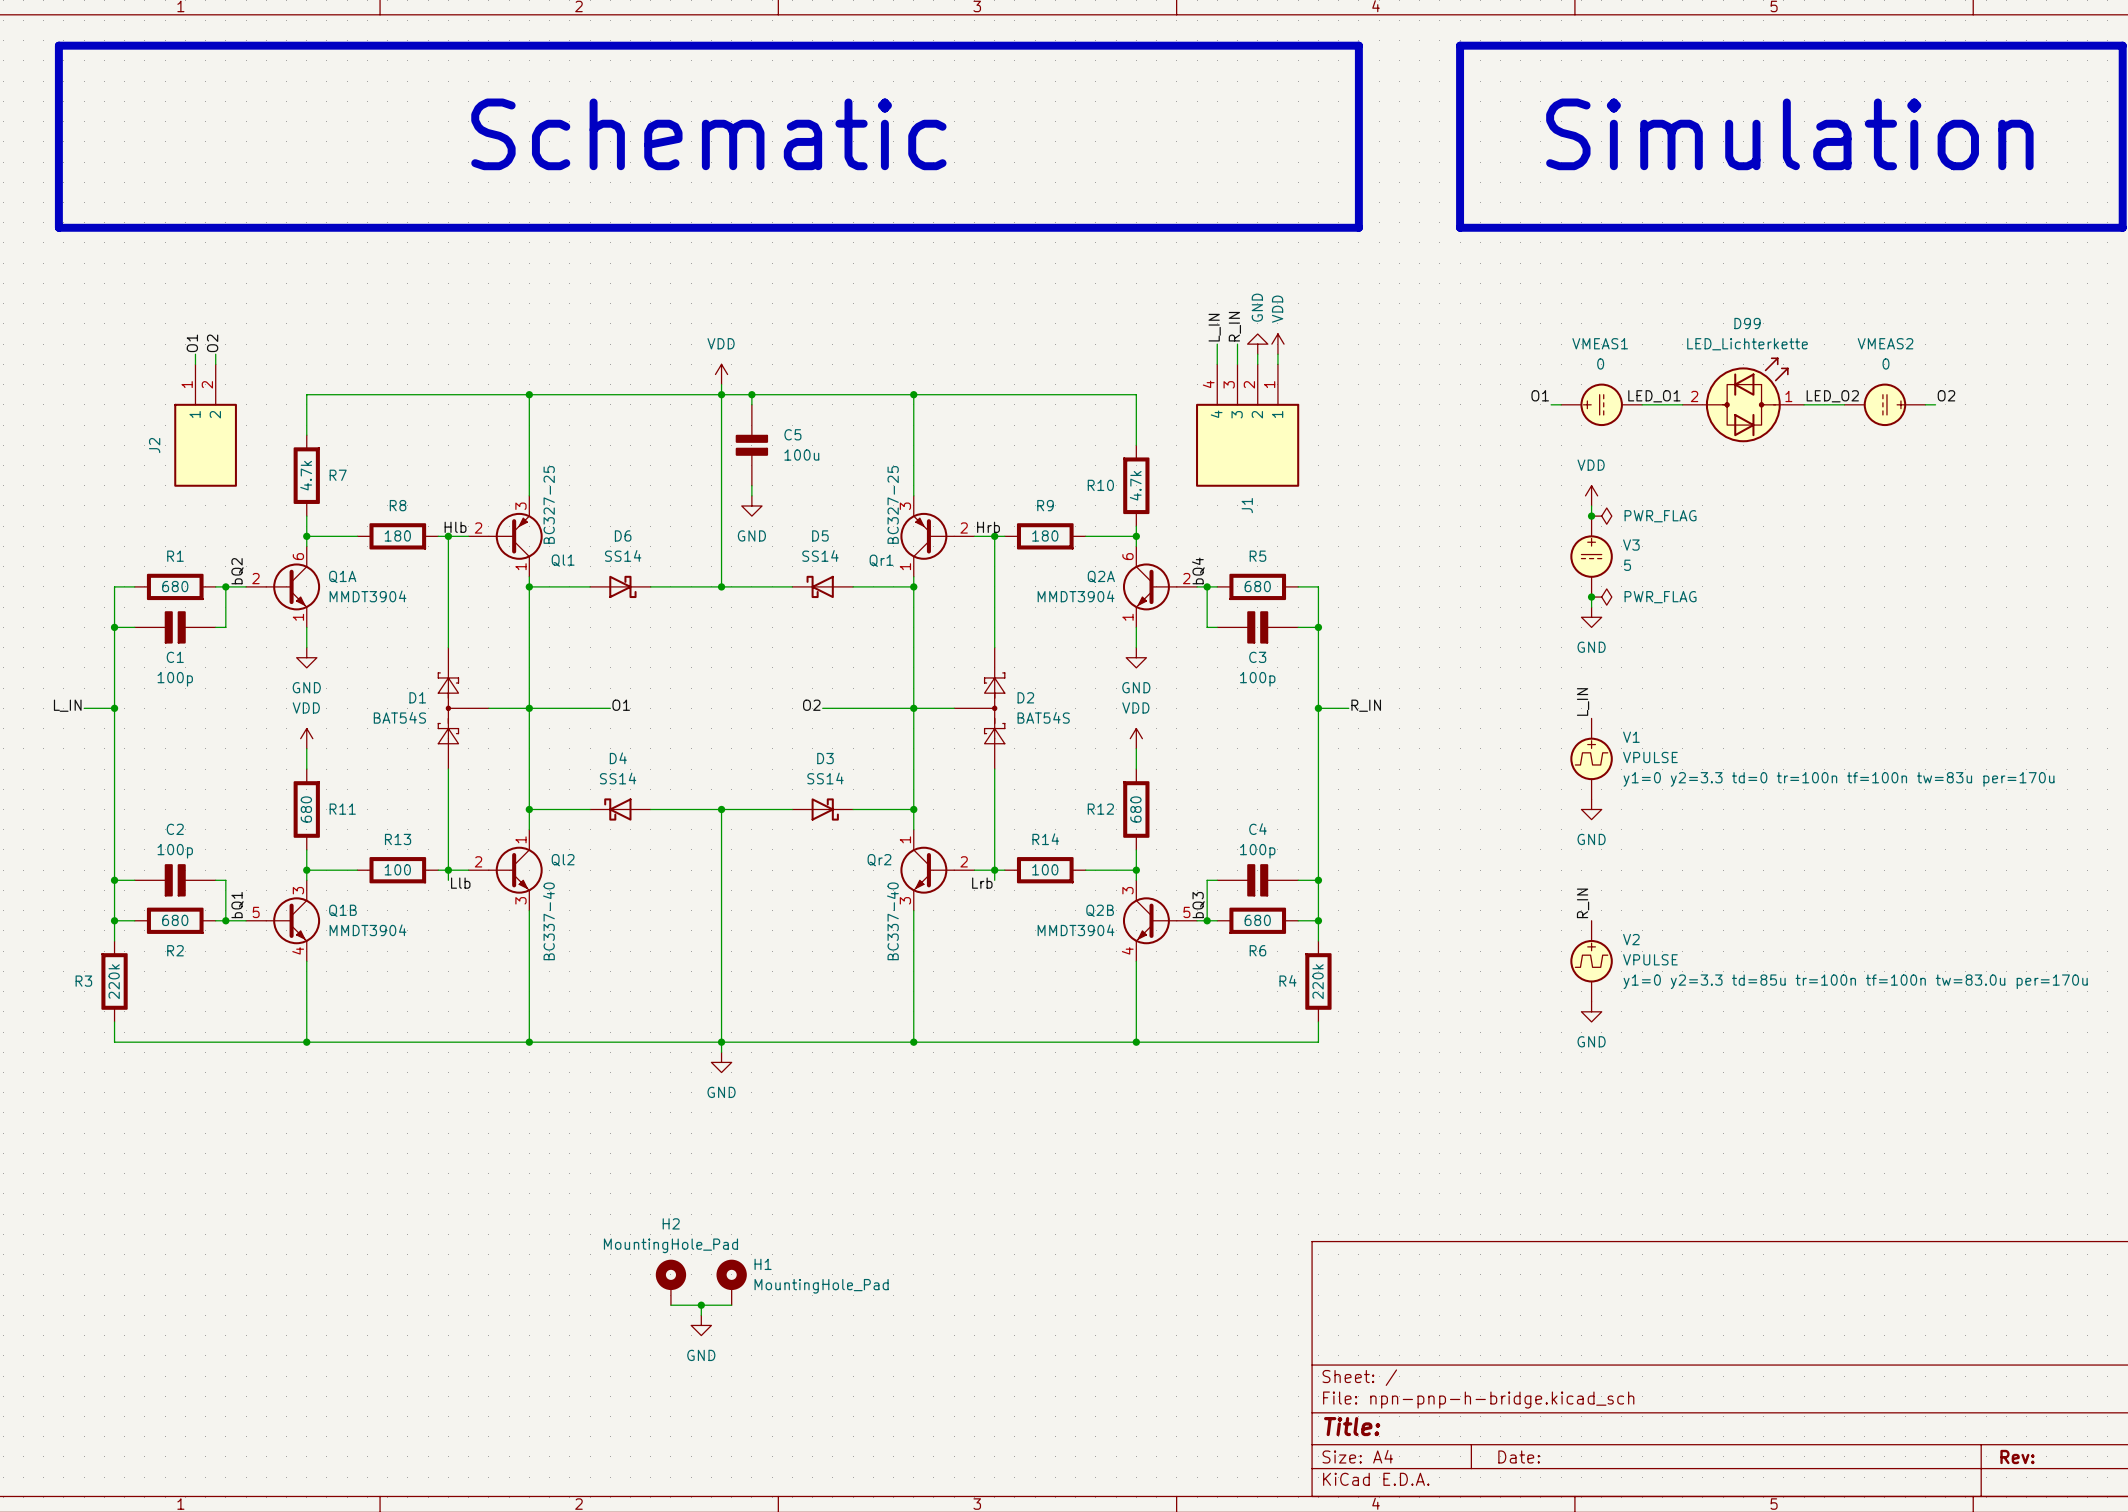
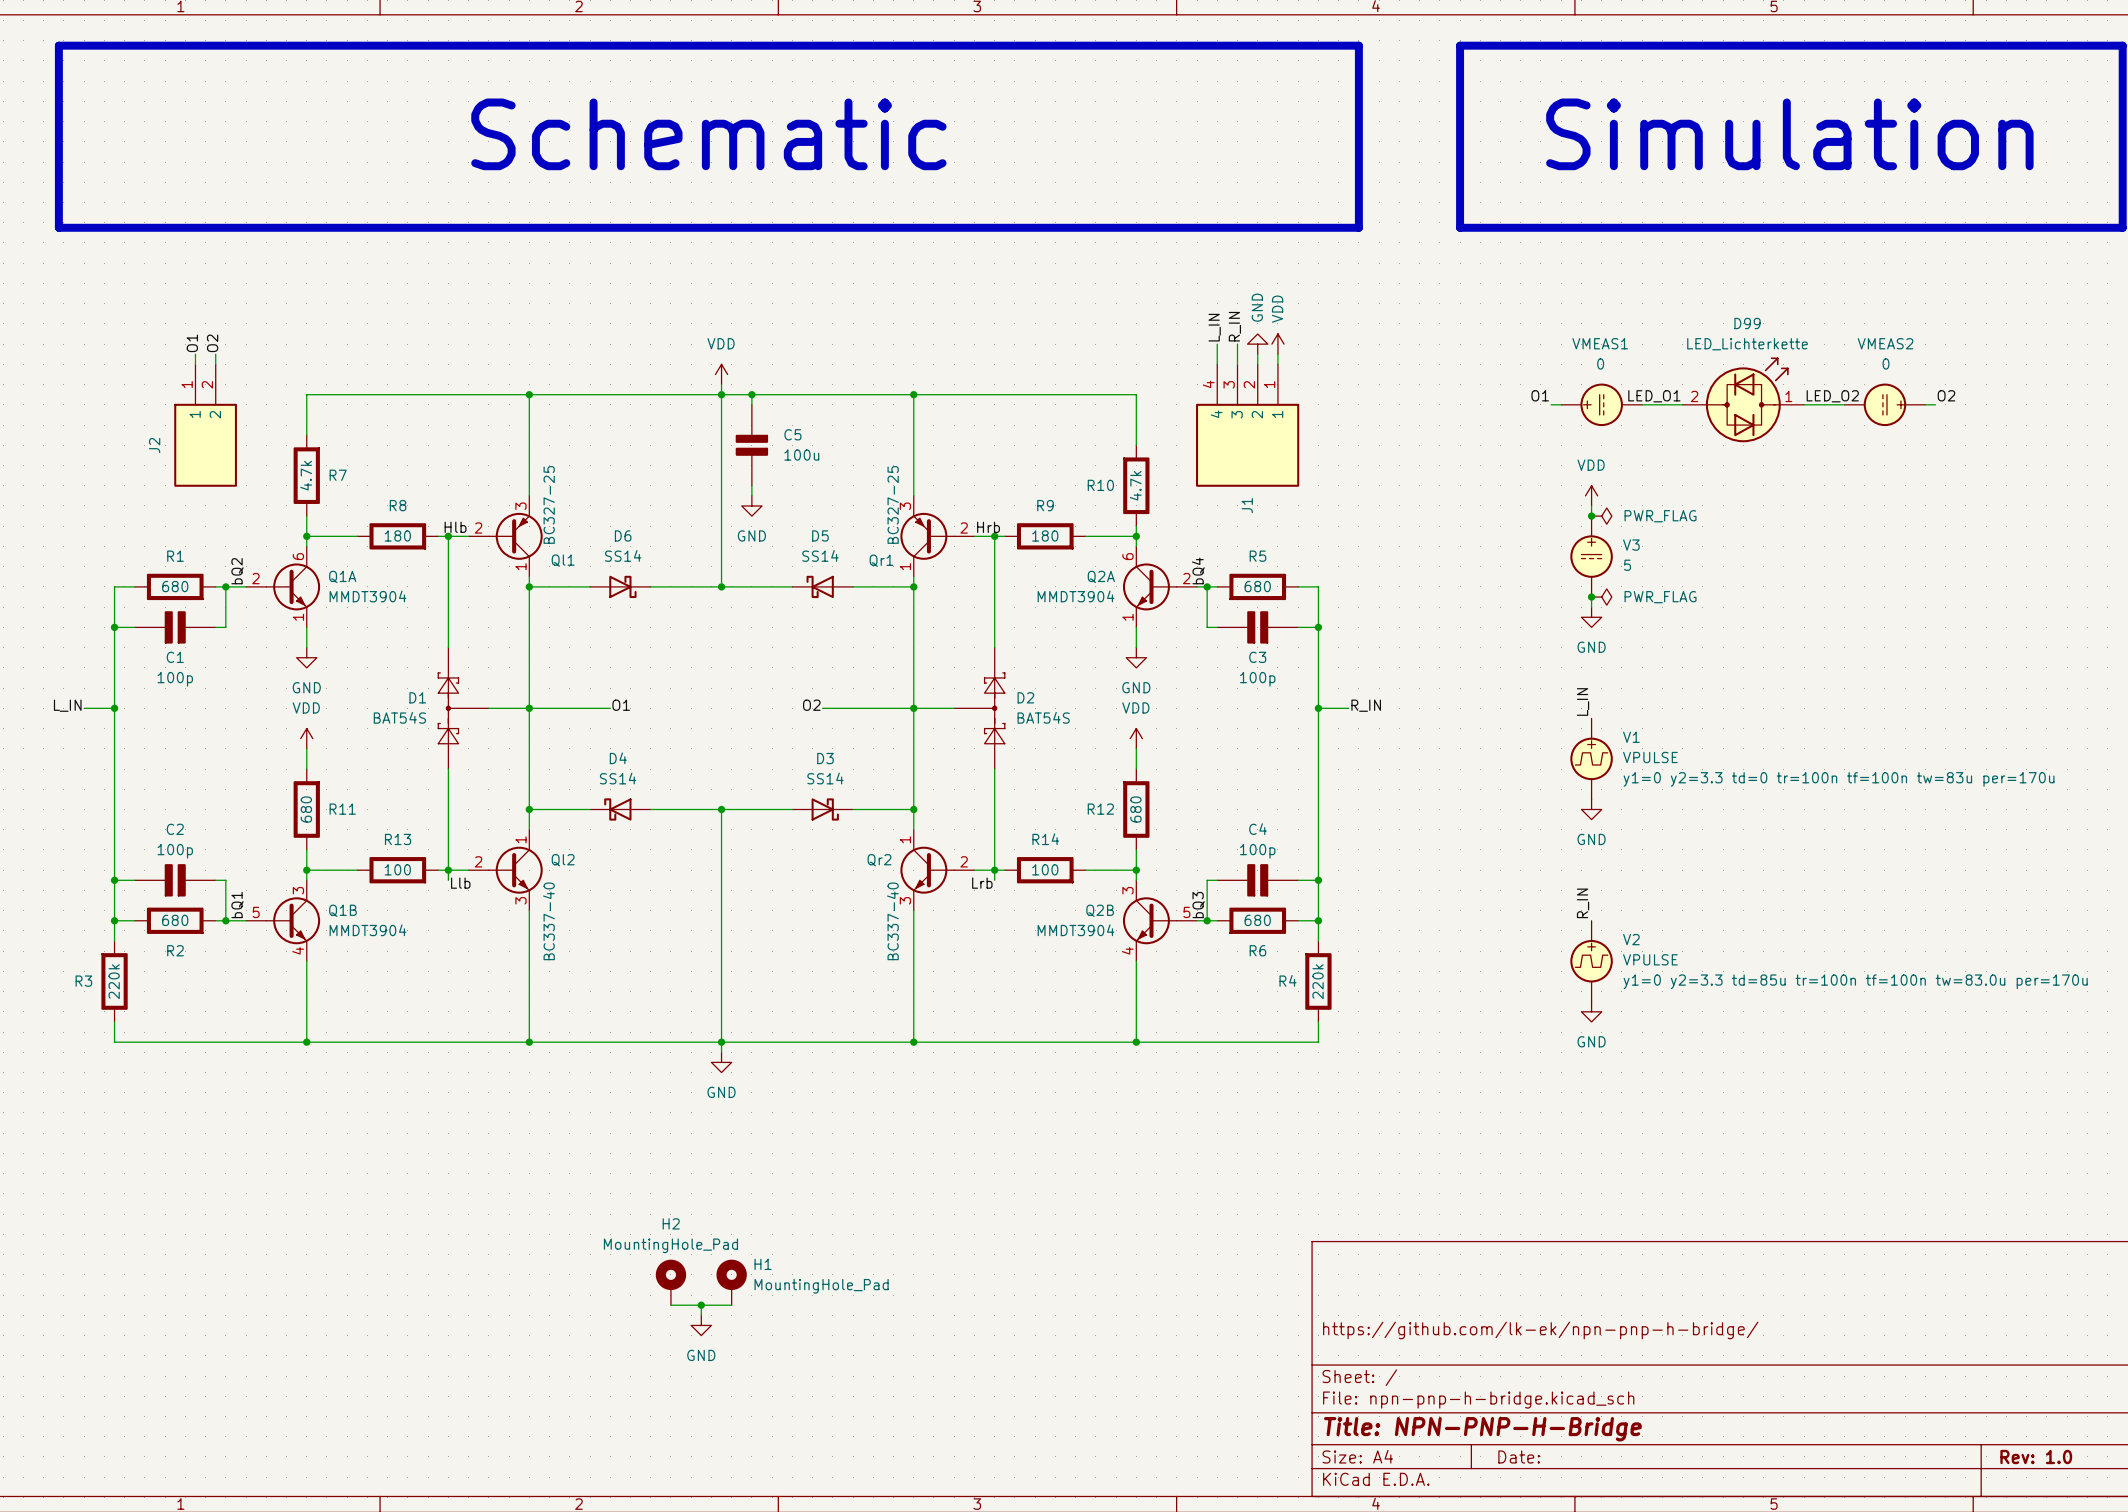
title block: none -> https://github.com/lk-ek/npn-pnp-h-bridge/ (1540, 1330)
title block: Title: (1352, 1426) -> Title: NPN-PNP-H-Bridge (1482, 1429)
title block: Rev: (2017, 1456) -> Rev: 1.0 (2036, 1456)

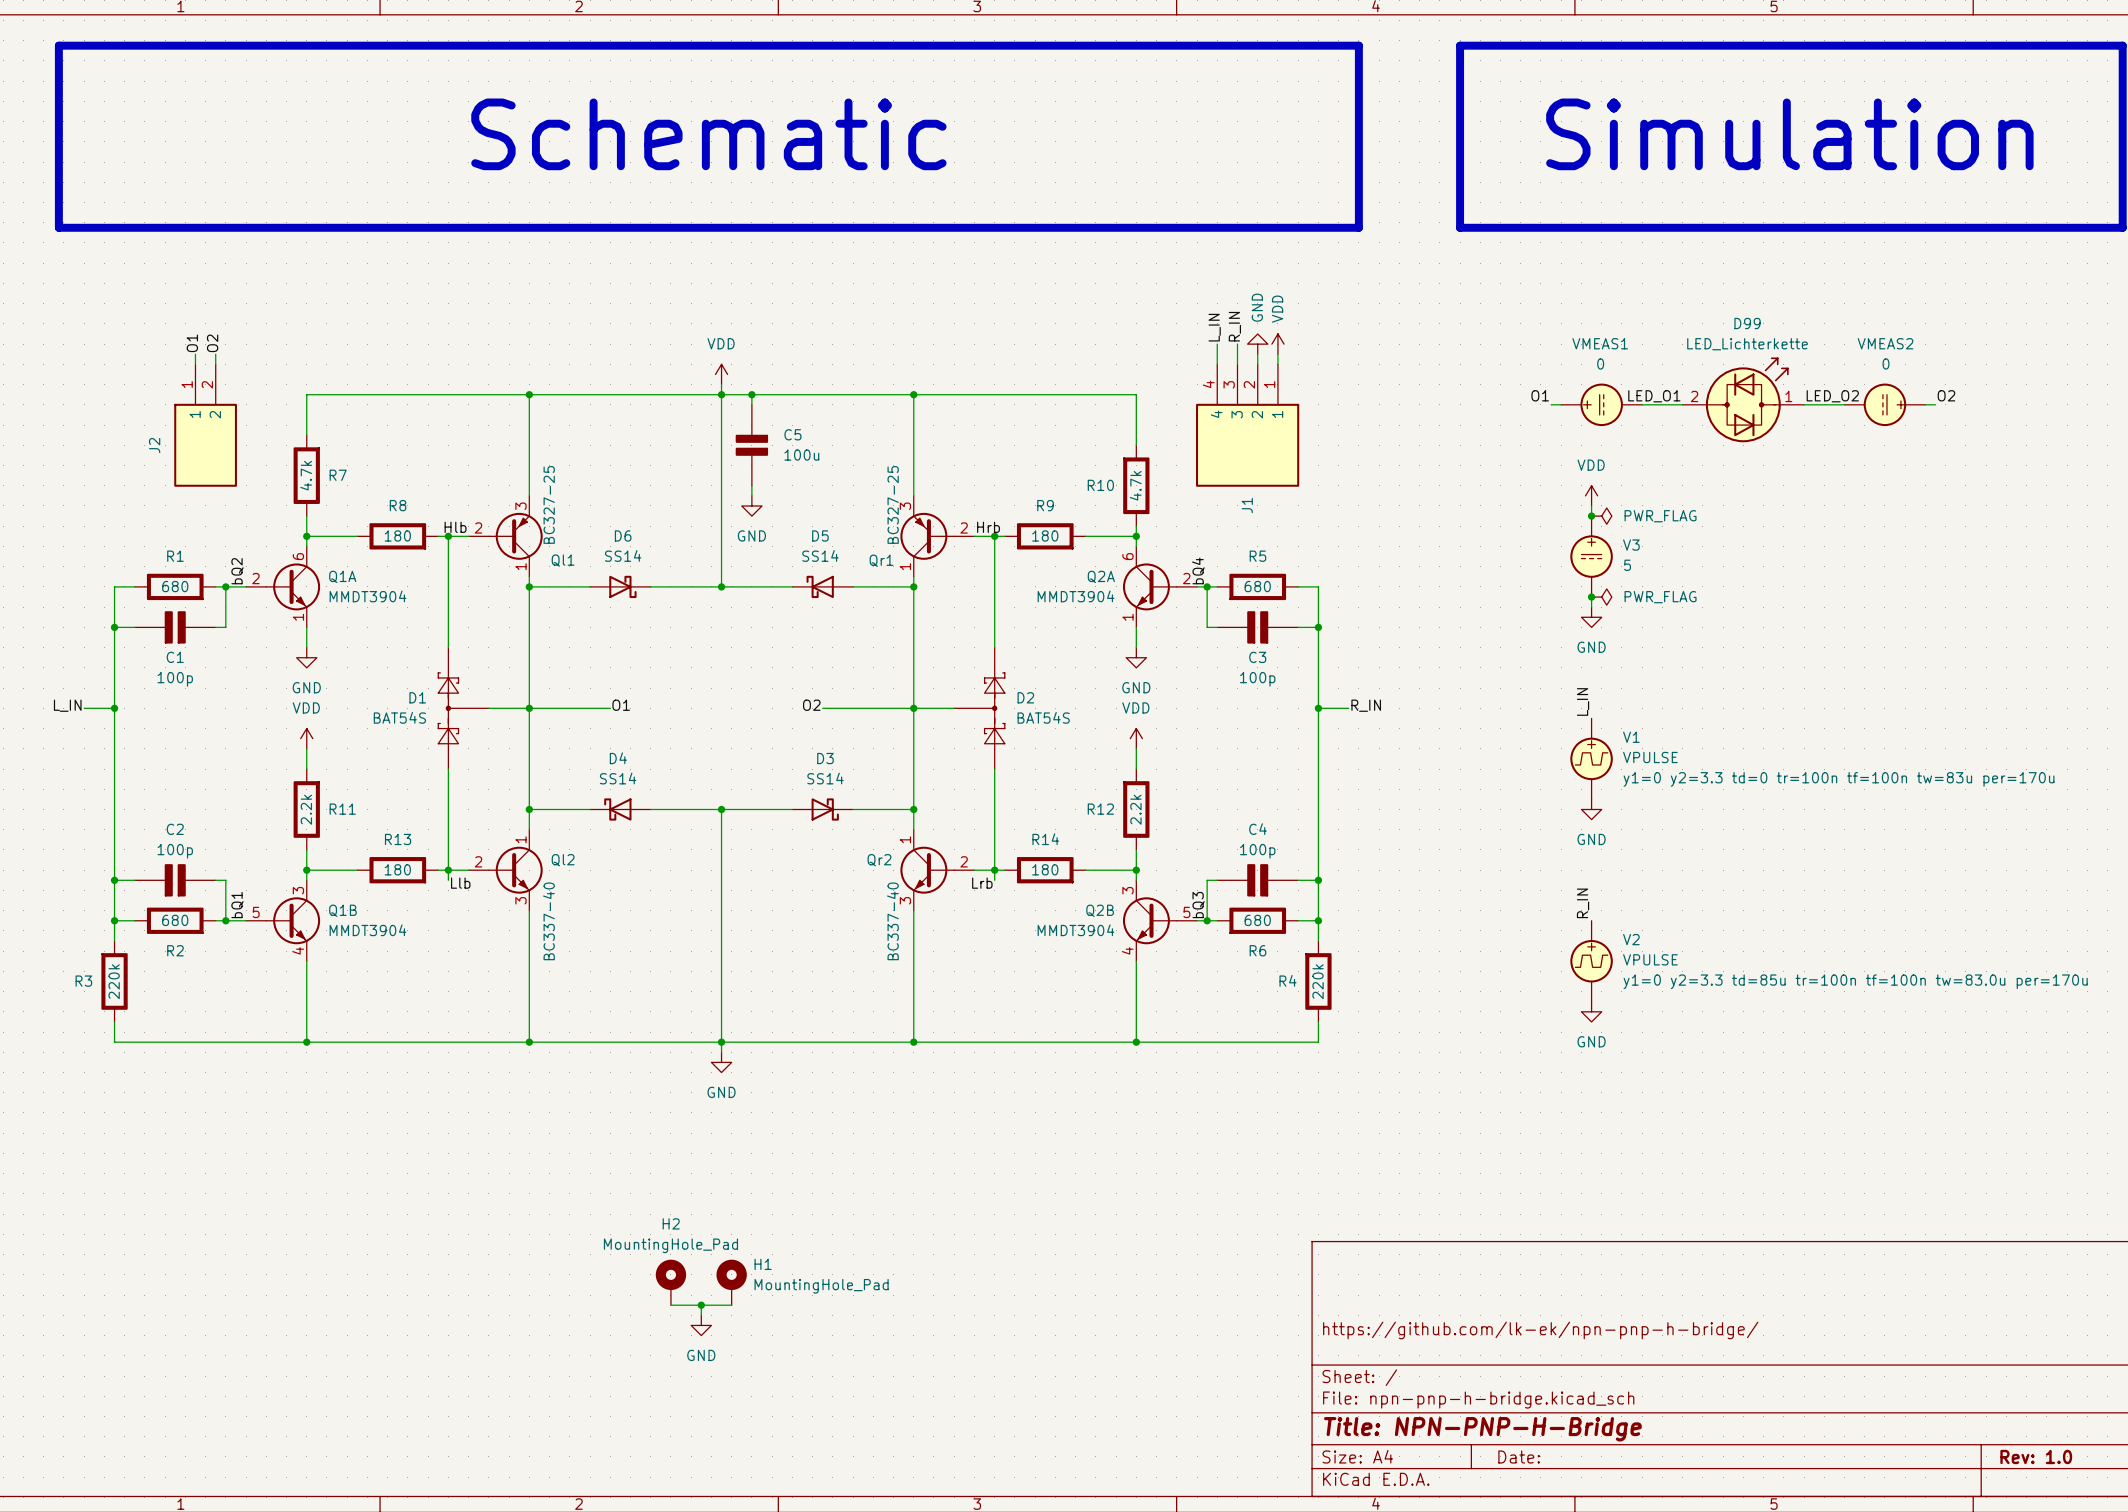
R11 value: 680 (306, 809) -> 2.2k (306, 809)
R12 value: 680 (1135, 809) -> 2.2k (1135, 809)
R13 value: 100 (397, 869) -> 180 (397, 869)
R14 value: 100 (1045, 869) -> 180 (1045, 869)

